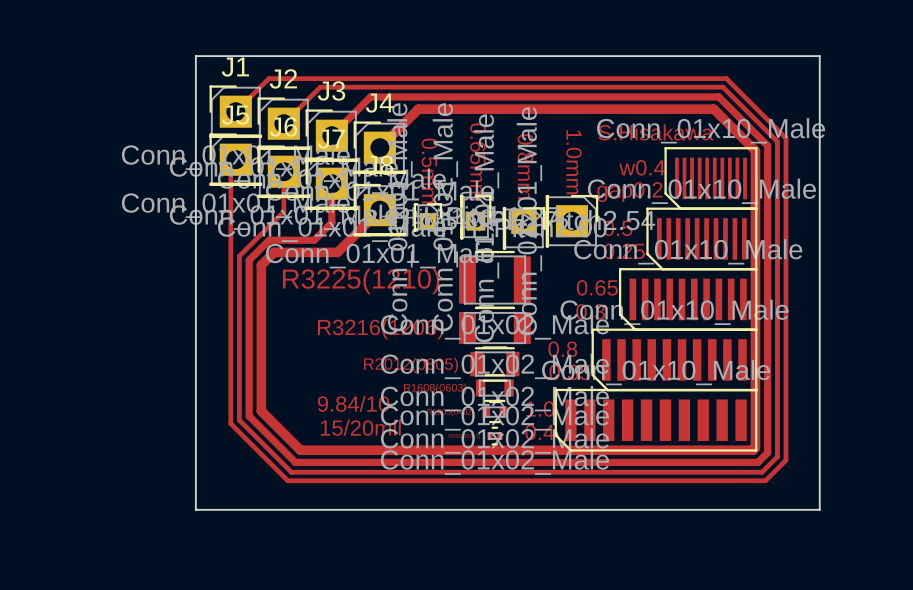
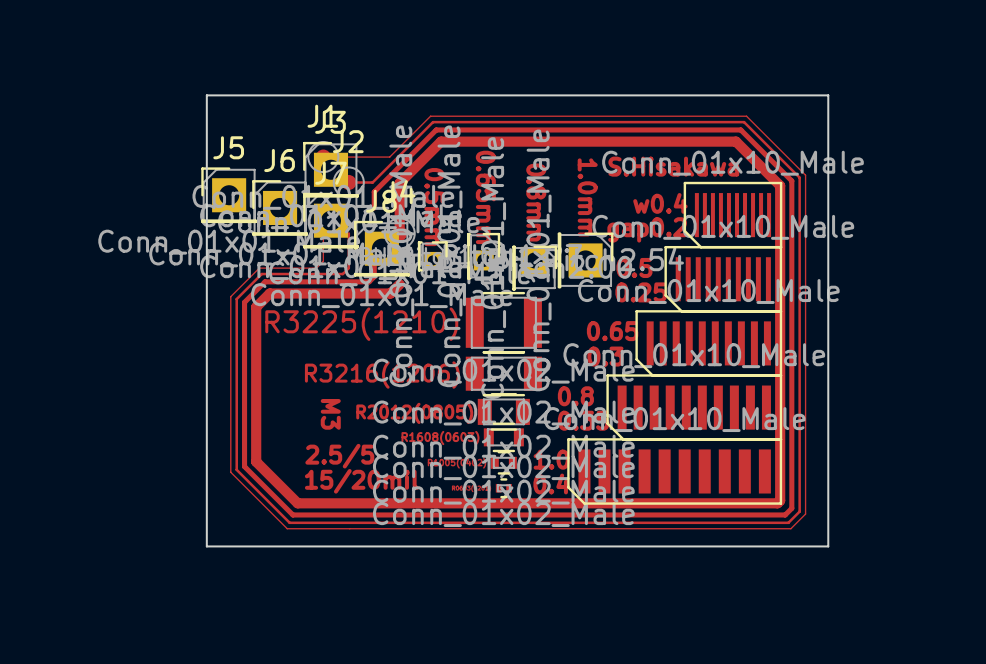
board edge: (195, 56) (195, 509) (819, 509) (819, 56) (195, 56) -> (206, 95) (206, 546) (828, 546) (828, 95) (206, 95)
J1 footprint: [209, 85, 263, 138] -> [307, 141, 340, 174]
J2 footprint: [257, 97, 311, 150] -> [332, 166, 365, 199]
top track: (435, 109) (418, 109) (379, 147) -> (441, 141) (399, 182) (399, 233)
top track: (235, 111) (268, 78) (726, 78) (785, 138) (785, 460) (765, 480) (287, 480) (230, 423) (230, 164) (235, 159) -> none
J4 footprint: [353, 121, 407, 174] -> [383, 217, 416, 250]
top track: (283, 123) (320, 87) (722, 87) (777, 141) (777, 456) (762, 472) (291, 472) (239, 420) (239, 256) (283, 211) (283, 171) -> none
top track: none -> (323, 157) (389, 157) (430, 116) (746, 116) (805, 175) (805, 514) (790, 528) (287, 528) (230, 472) (230, 296) (259, 268) (316, 268) (323, 261) (323, 207)
top track: (331, 135) (370, 96) (718, 96) (767, 145) (767, 452) (757, 462) (295, 462) (249, 416) (249, 260) (269, 240) (314, 240) (331, 222) (331, 183) -> none
top track: none -> (348, 182) (372, 182) (433, 122) (744, 122) (799, 177) (799, 511) (788, 522) (289, 522) (236, 469) (236, 299) (261, 274) (342, 274) (348, 268) (348, 233)
top track: none -> (374, 207) (374, 191) (436, 129) (740, 129) (791, 180) (791, 508) (785, 514) (292, 514) (244, 466) (244, 302) (265, 281) (369, 281) (374, 276) (374, 258)
top track: (379, 210) (337, 252) -> (399, 284) (390, 293) (337, 293)
text: none -> M3 (330, 414)
text: 9.84/10 (353, 403) -> 2.5/5 (339, 456)

